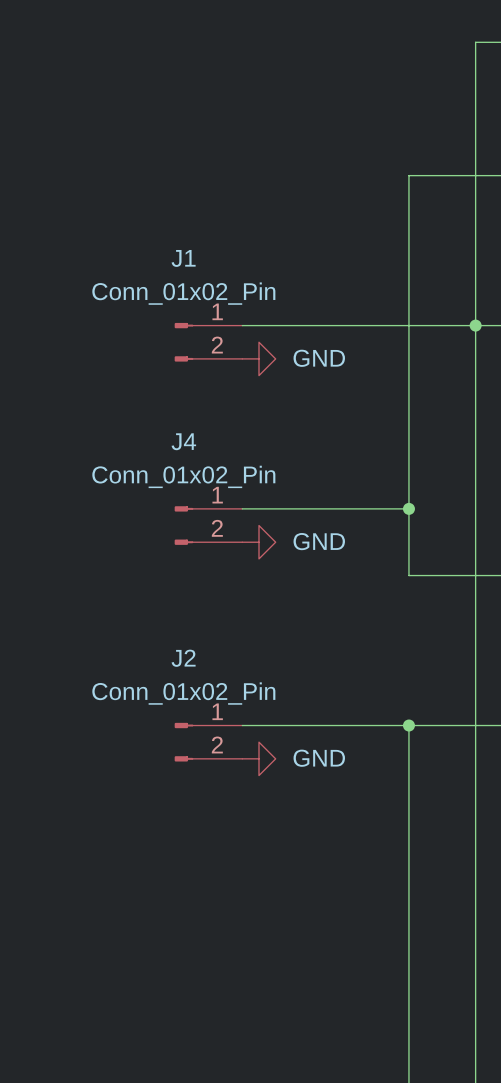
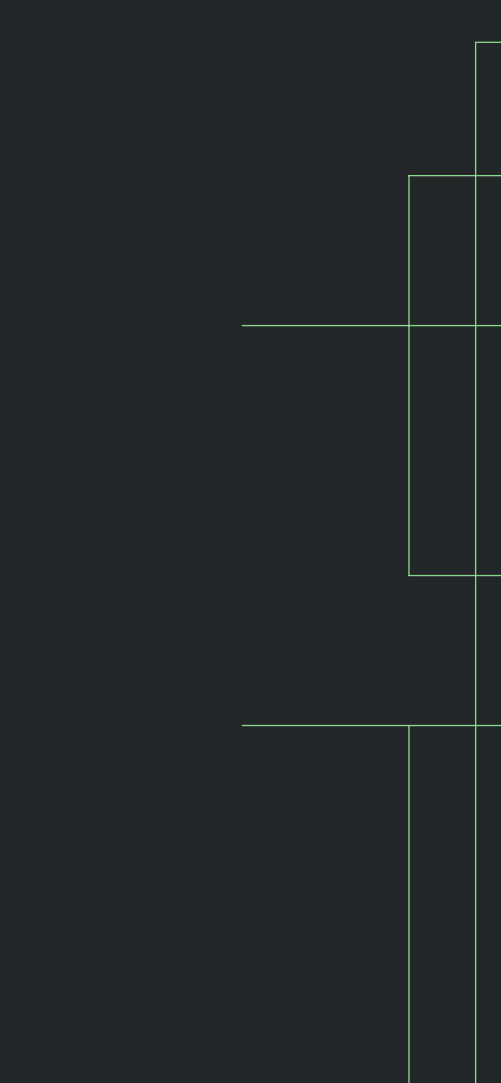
junction: (475, 325) -> none
J1: Conn_01x02_Pin (208, 342) -> none
power symbol: GND (259, 358) -> none
wire: (242, 508) (408, 508) -> none
junction: (408, 508) -> none
J4: Conn_01x02_Pin (208, 525) -> none
power symbol: GND (259, 542) -> none
junction: (408, 725) -> none
J2: Conn_01x02_Pin (208, 742) -> none
power symbol: GND (259, 758) -> none

